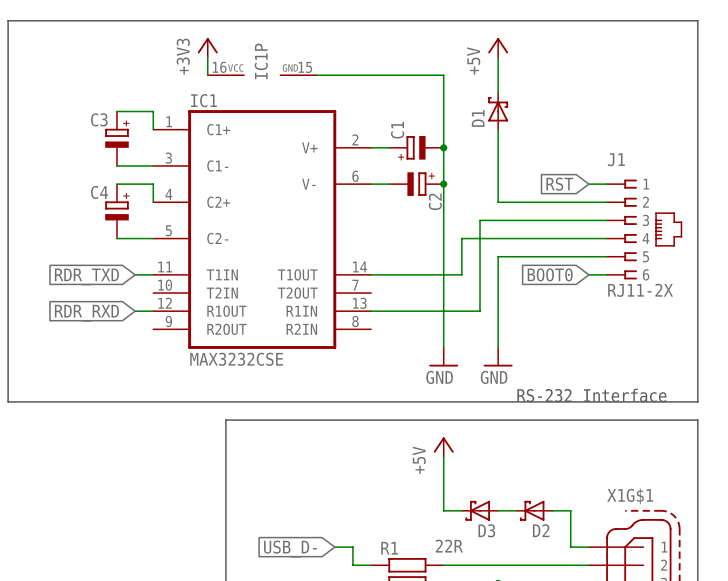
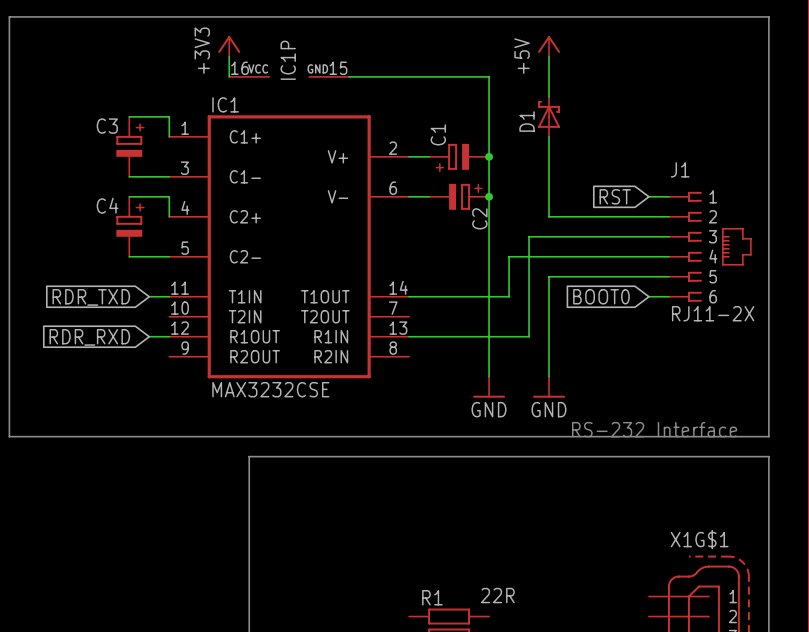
power symbol: +5V (443, 446) -> none
wire: (443, 456) (443, 510) (461, 510) -> none
D3: (480, 510) -> none
wire: (498, 510) (516, 510) -> none
D2: (534, 510) -> none
wire: (552, 510) (570, 510) (570, 547) (588, 547) -> none
wire: (334, 547) (352, 547) (352, 565) (371, 565) -> none
global label: USB_D- (290, 549) -> none
wire: (443, 565) (588, 565) -> none

